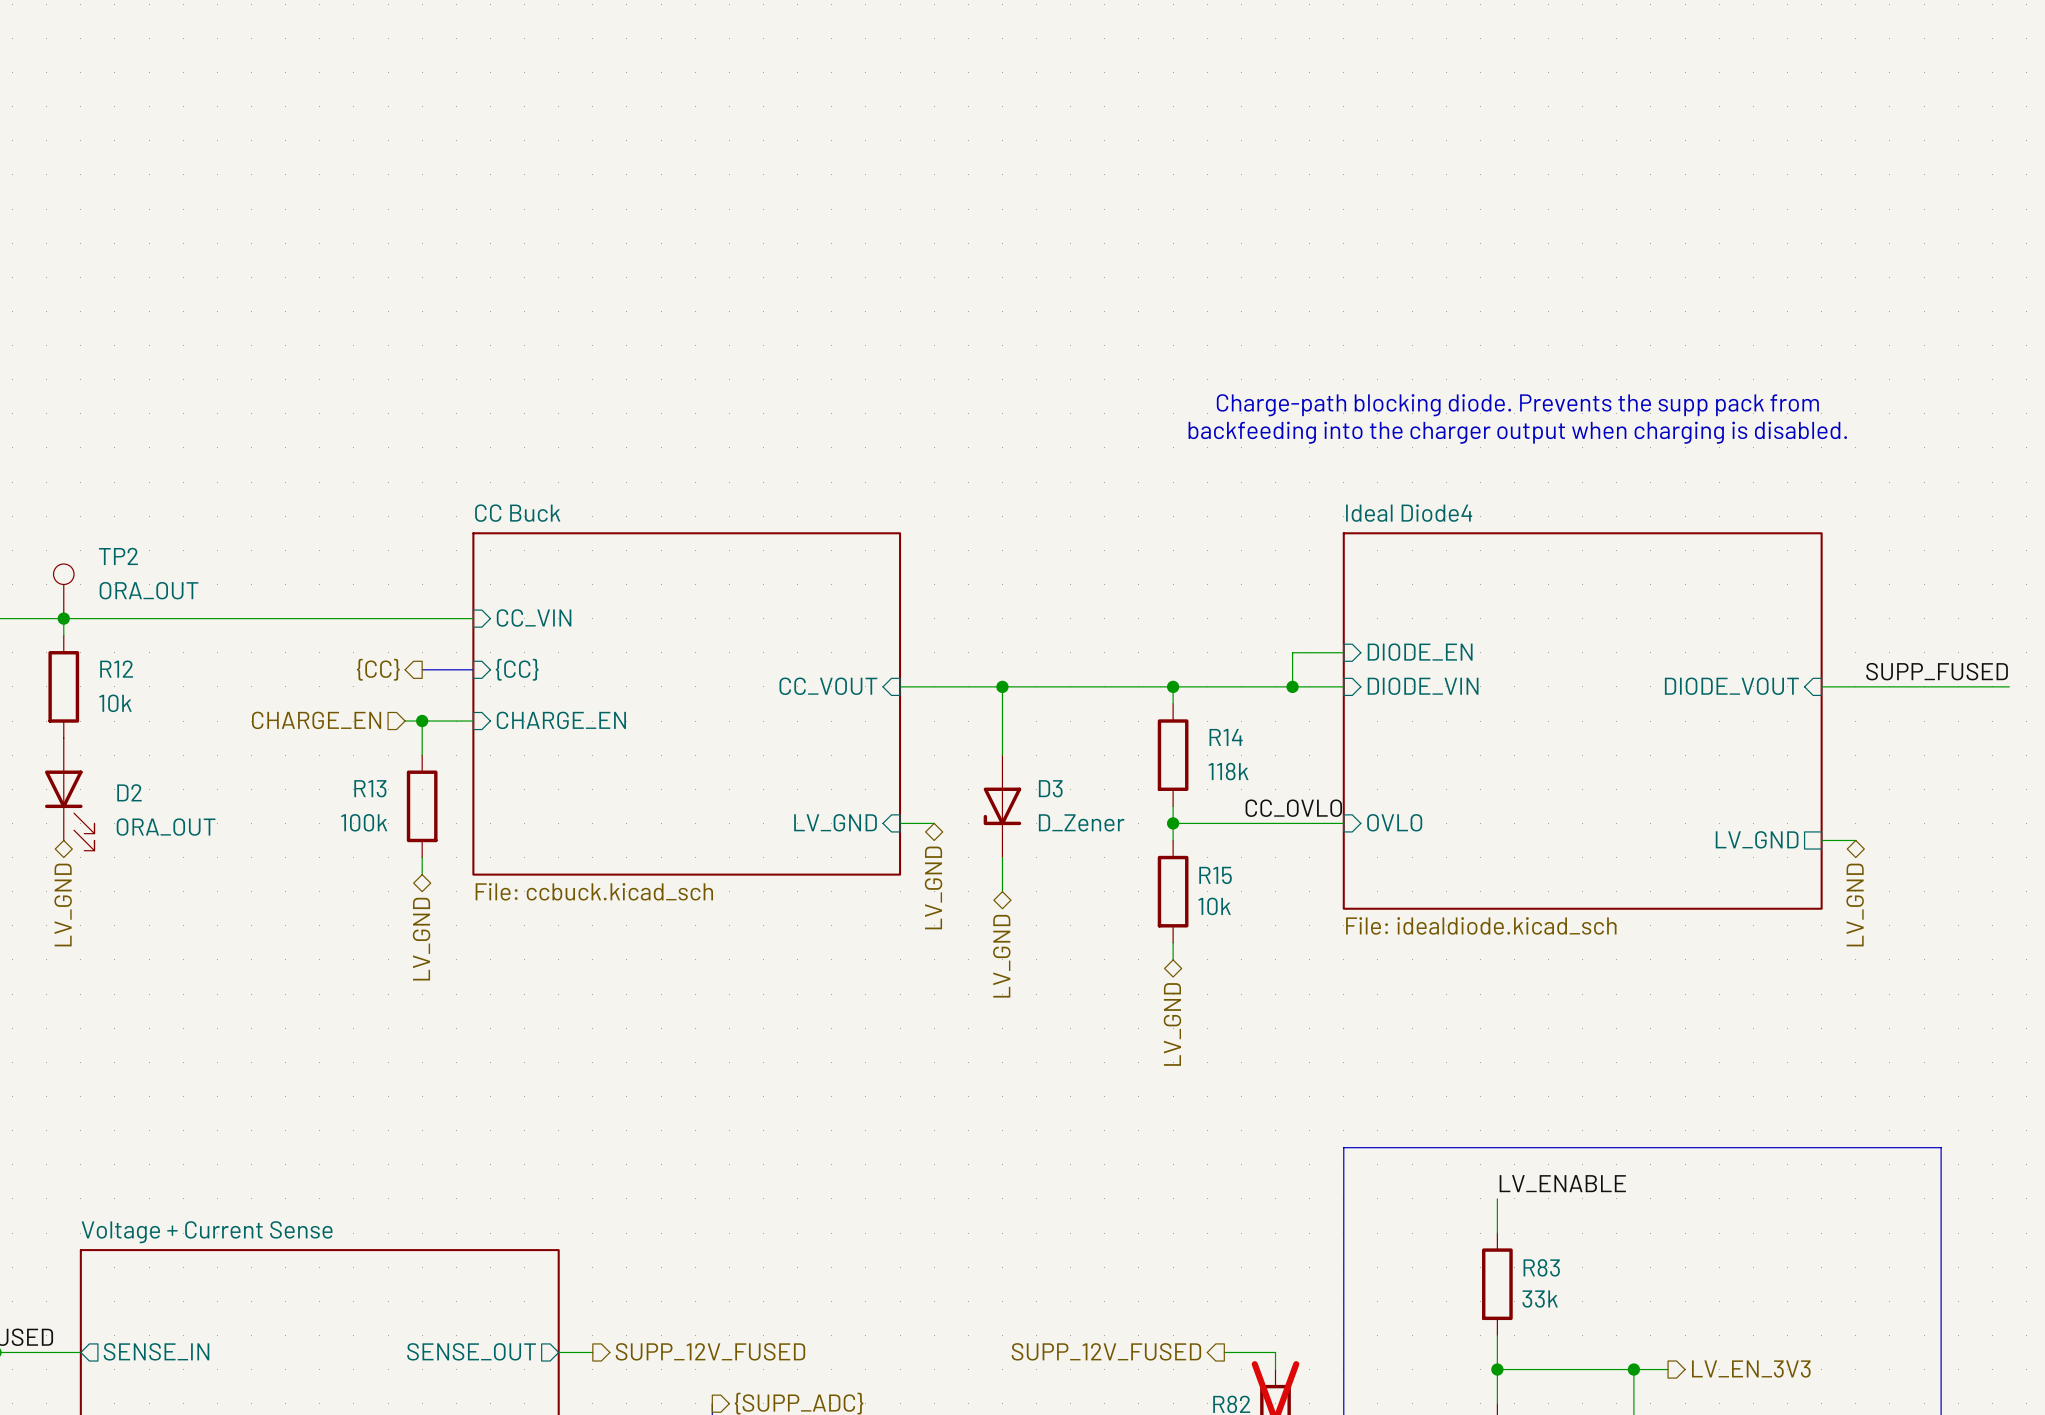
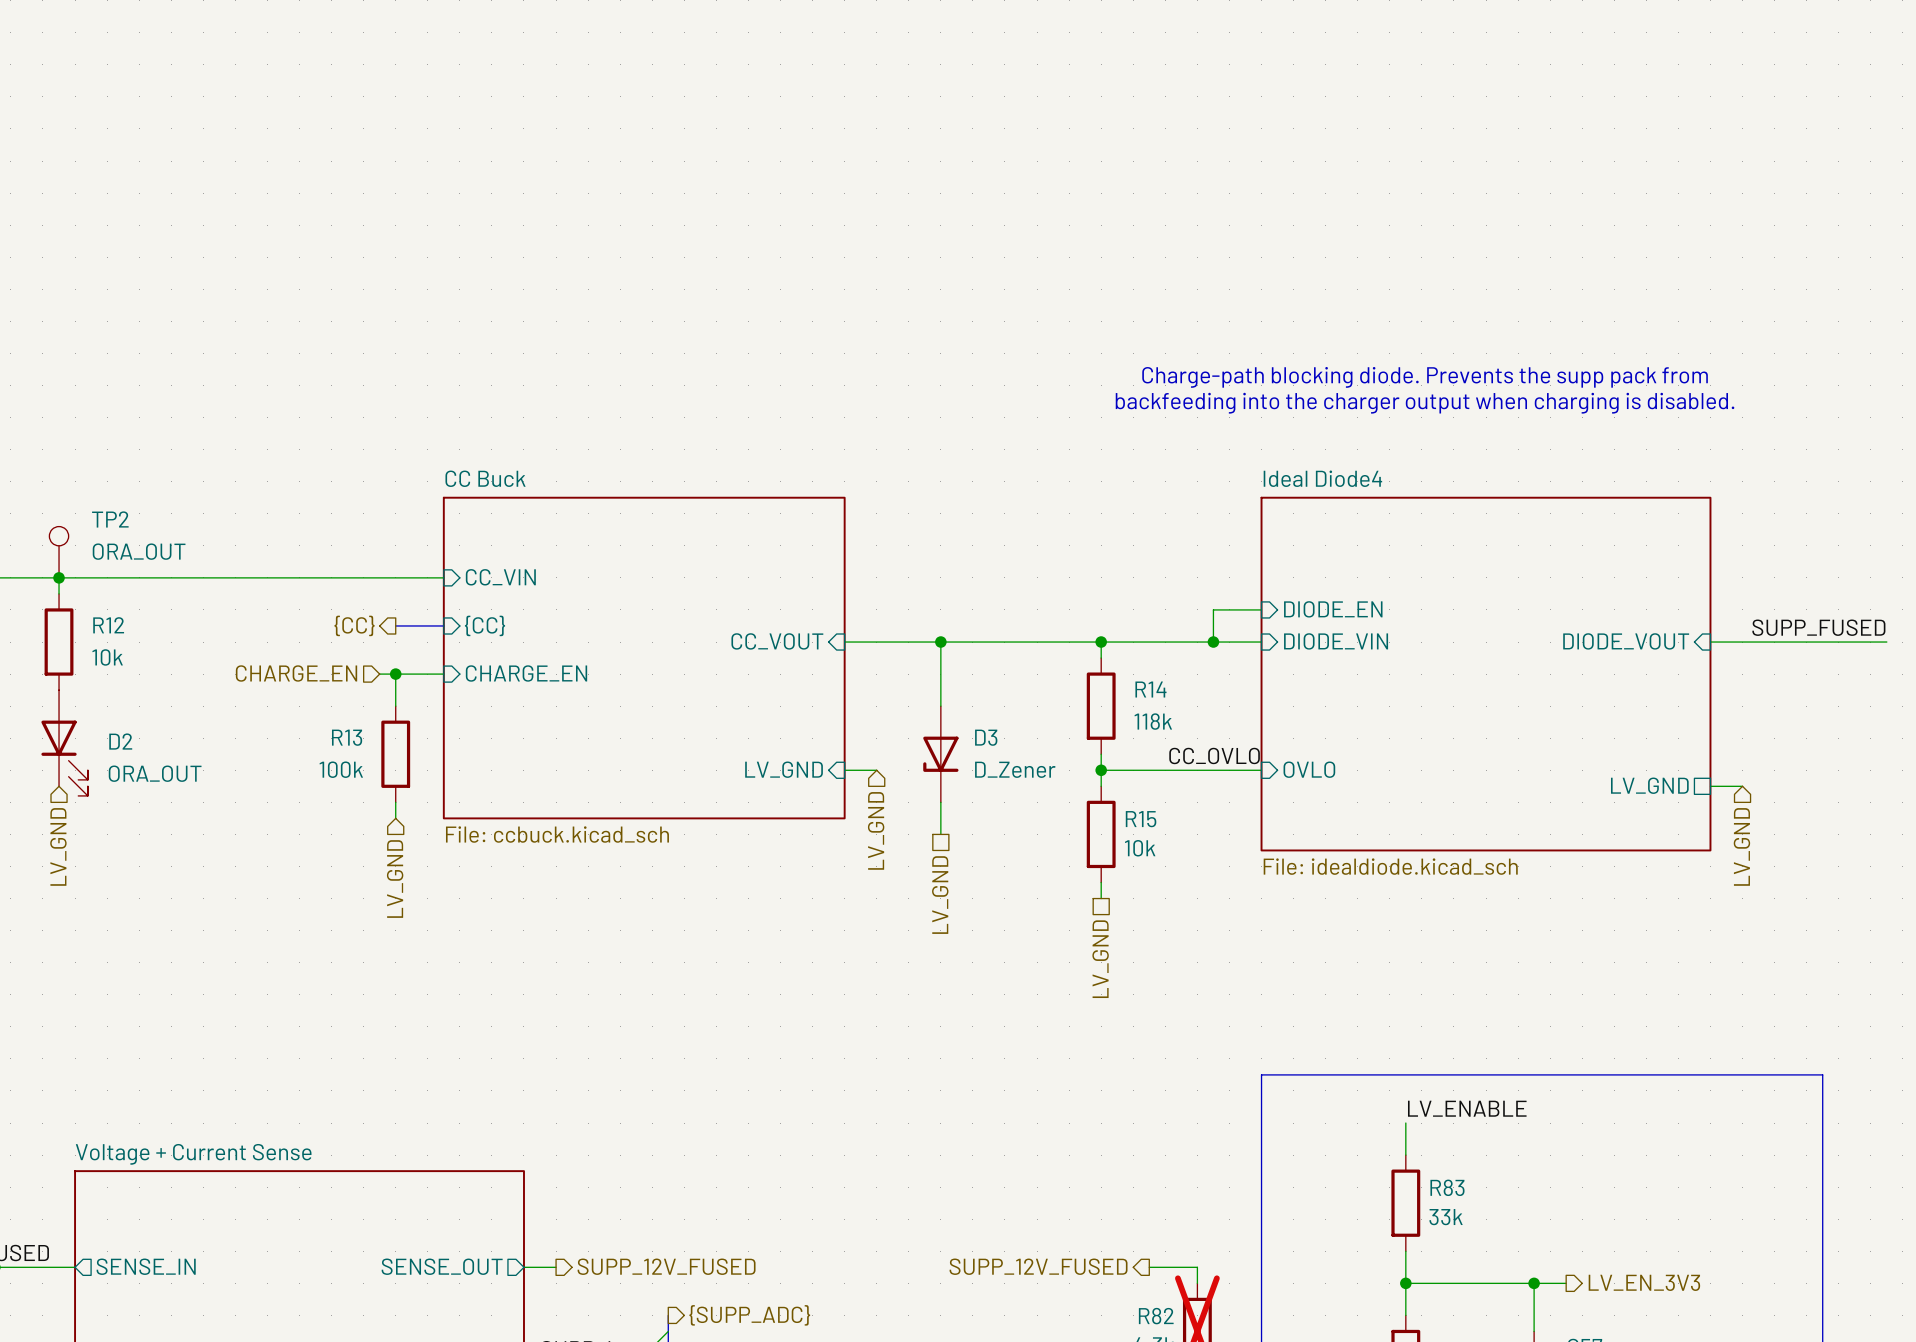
hierarchical label shape: bidirectional (933, 887) -> input (876, 830)
hierarchical label shape: bidirectional (63, 905) -> input (58, 846)
hierarchical label shape: bidirectional (1855, 905) -> input (1741, 846)
hierarchical label shape: bidirectional (421, 939) -> input (395, 879)
hierarchical label shape: bidirectional (1001, 956) -> passive (940, 895)
hierarchical label shape: bidirectional (1172, 1024) -> passive (1100, 959)

